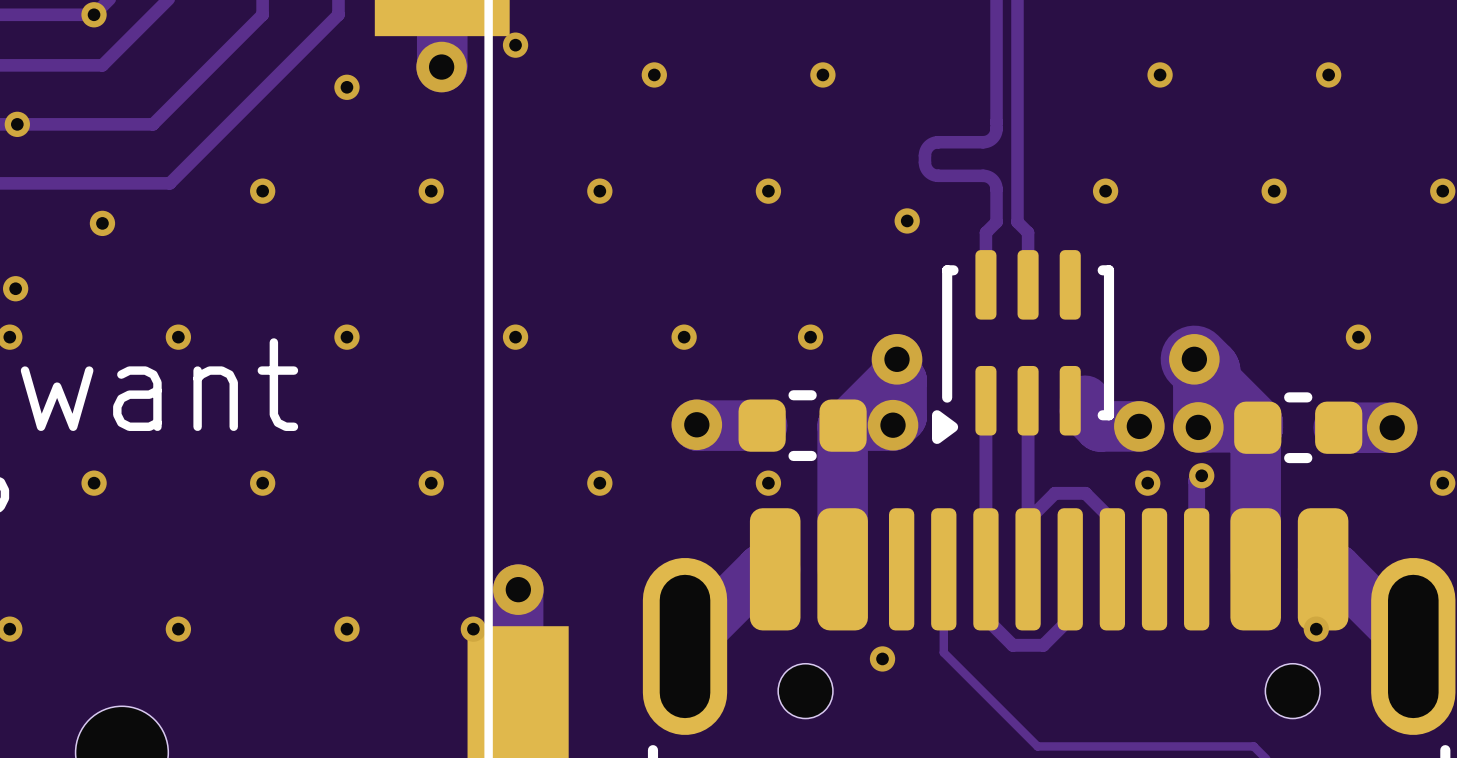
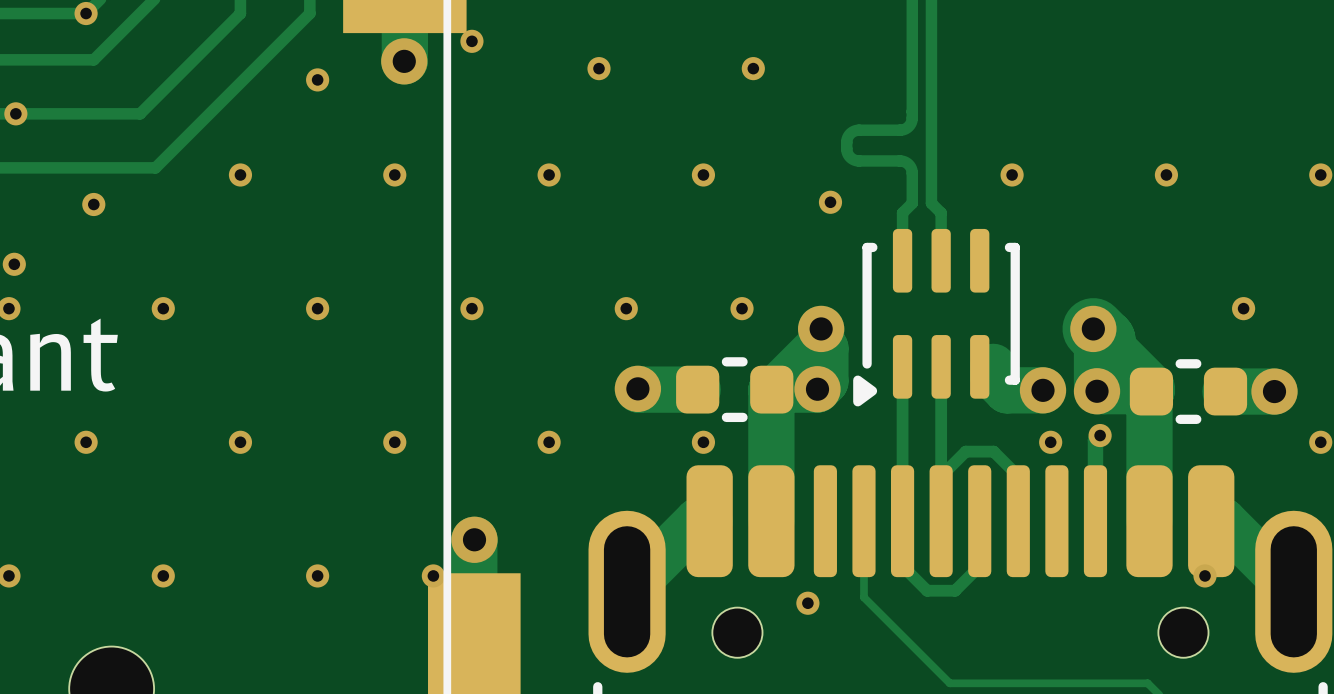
via: (1160, 74) -> none
via: (1328, 74) -> none

